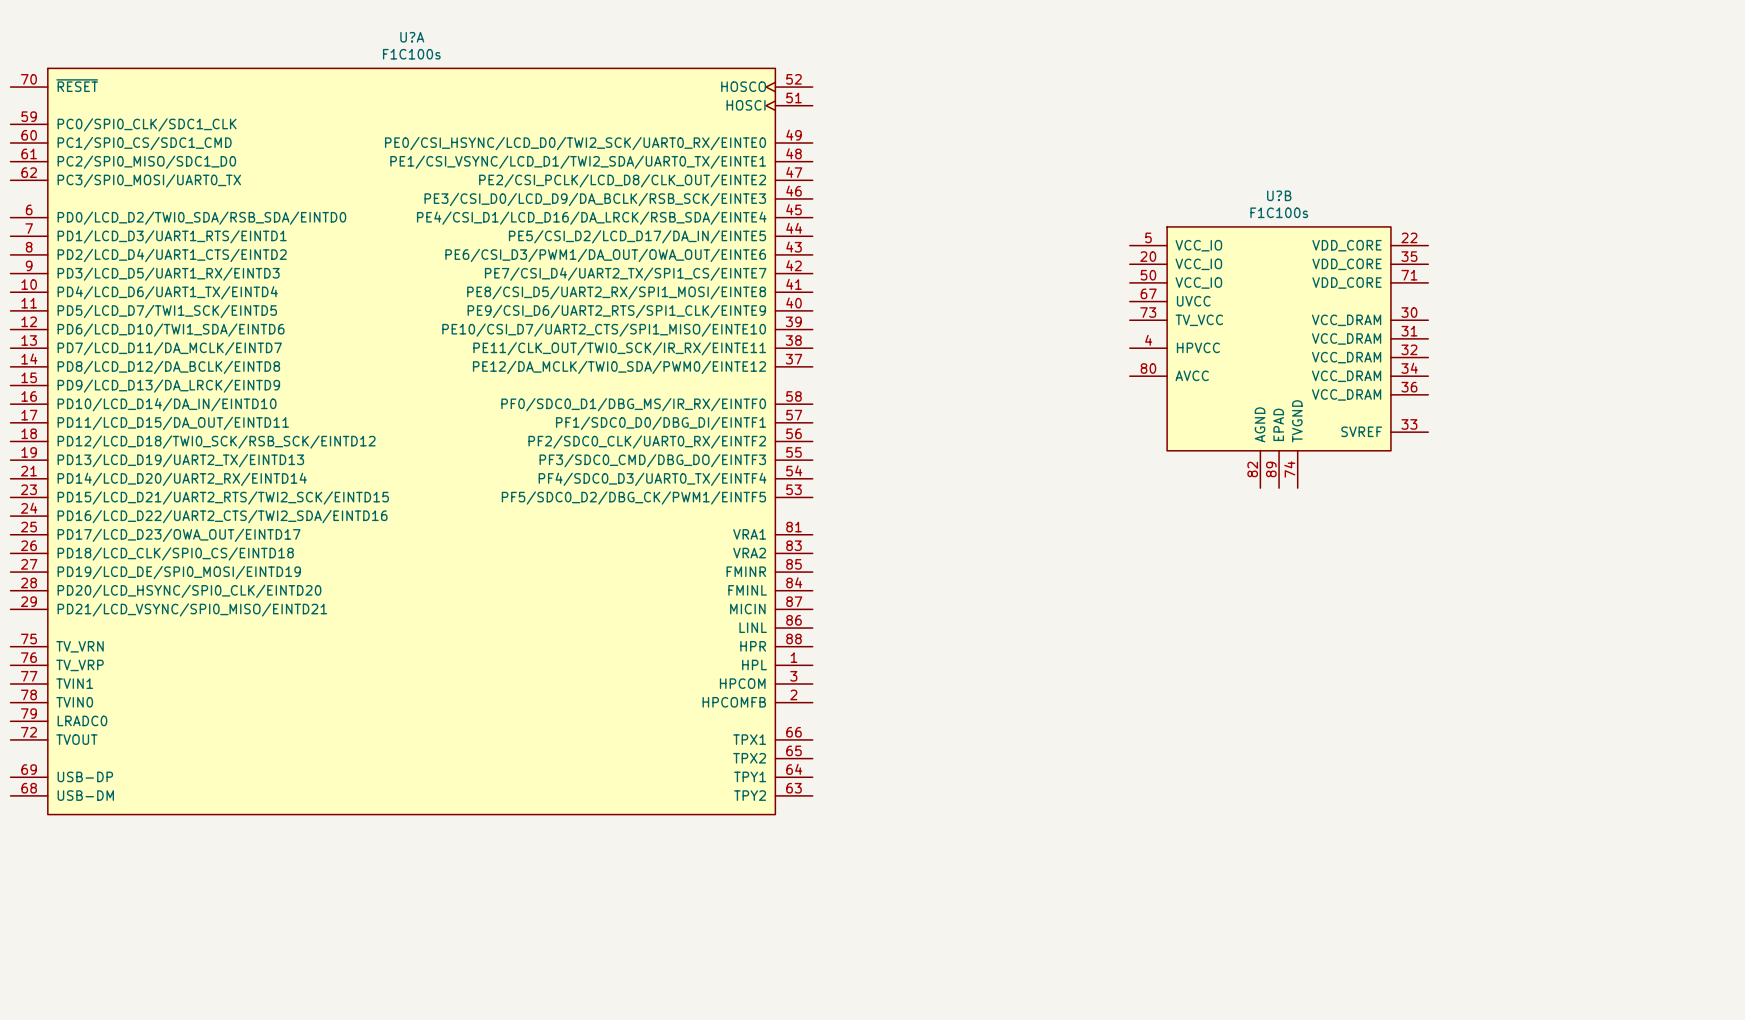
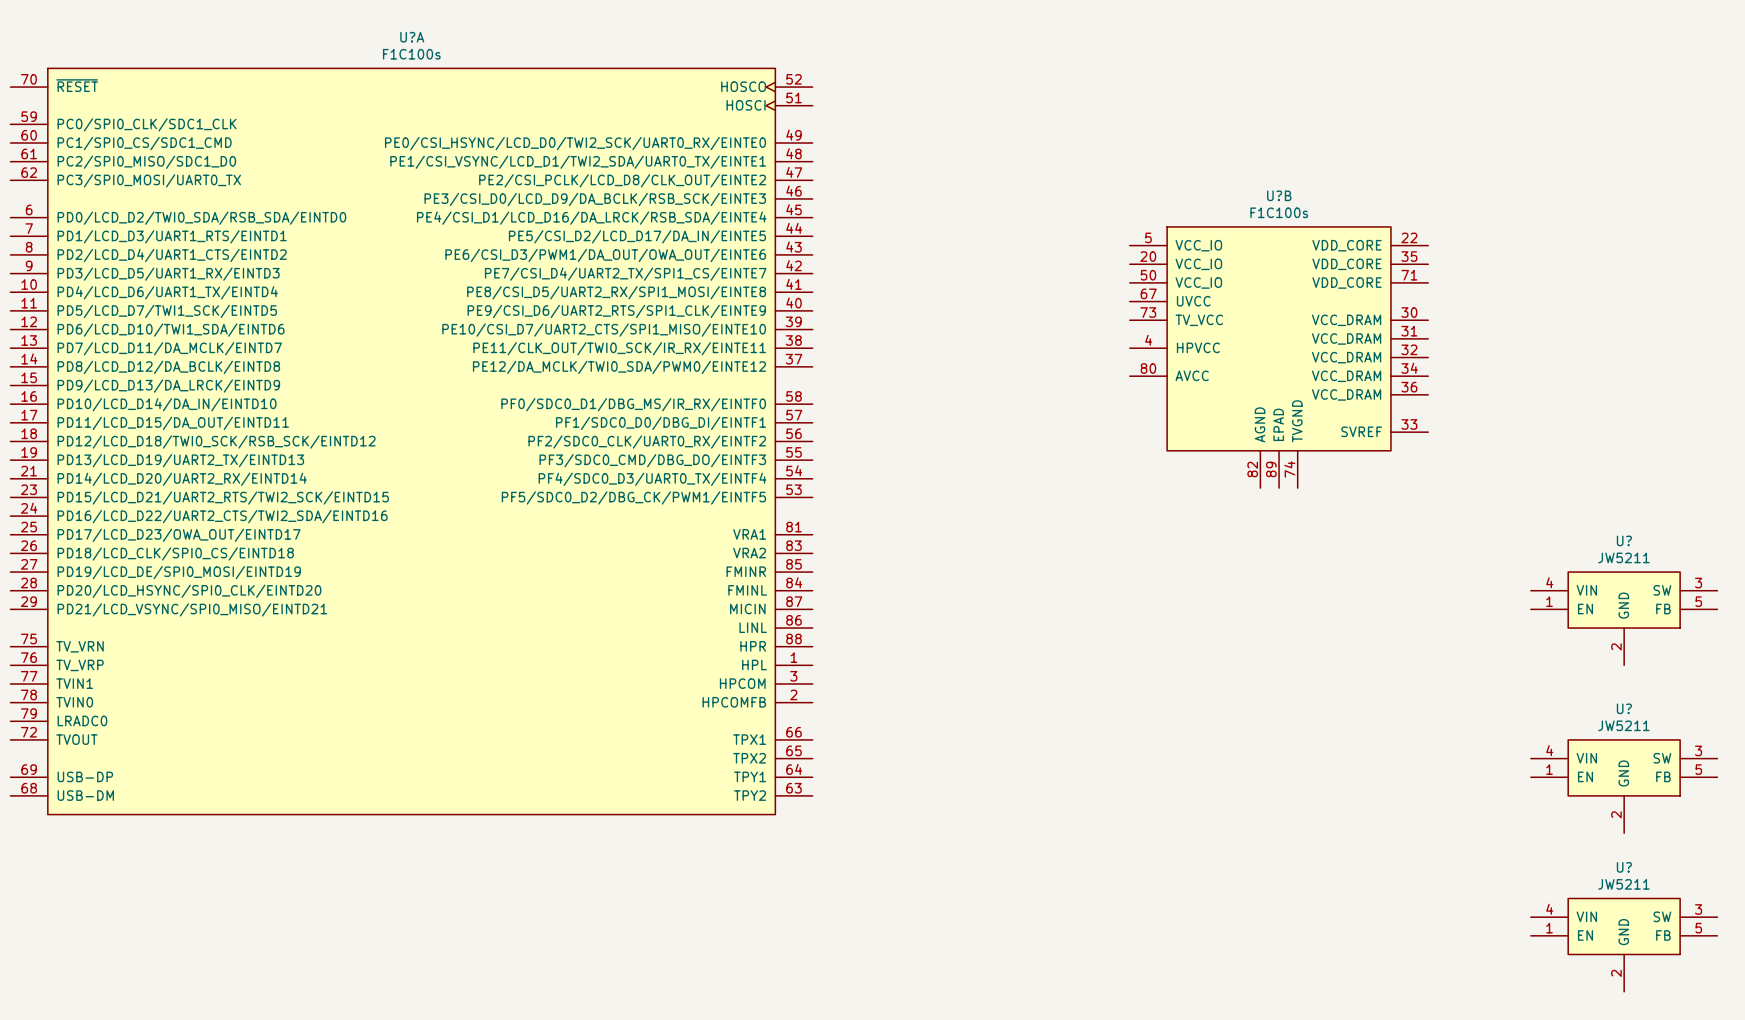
U?: none -> JW5211 (1624, 618)
U?: none -> JW5211 (1624, 786)
U?: none -> JW5211 (1624, 945)

